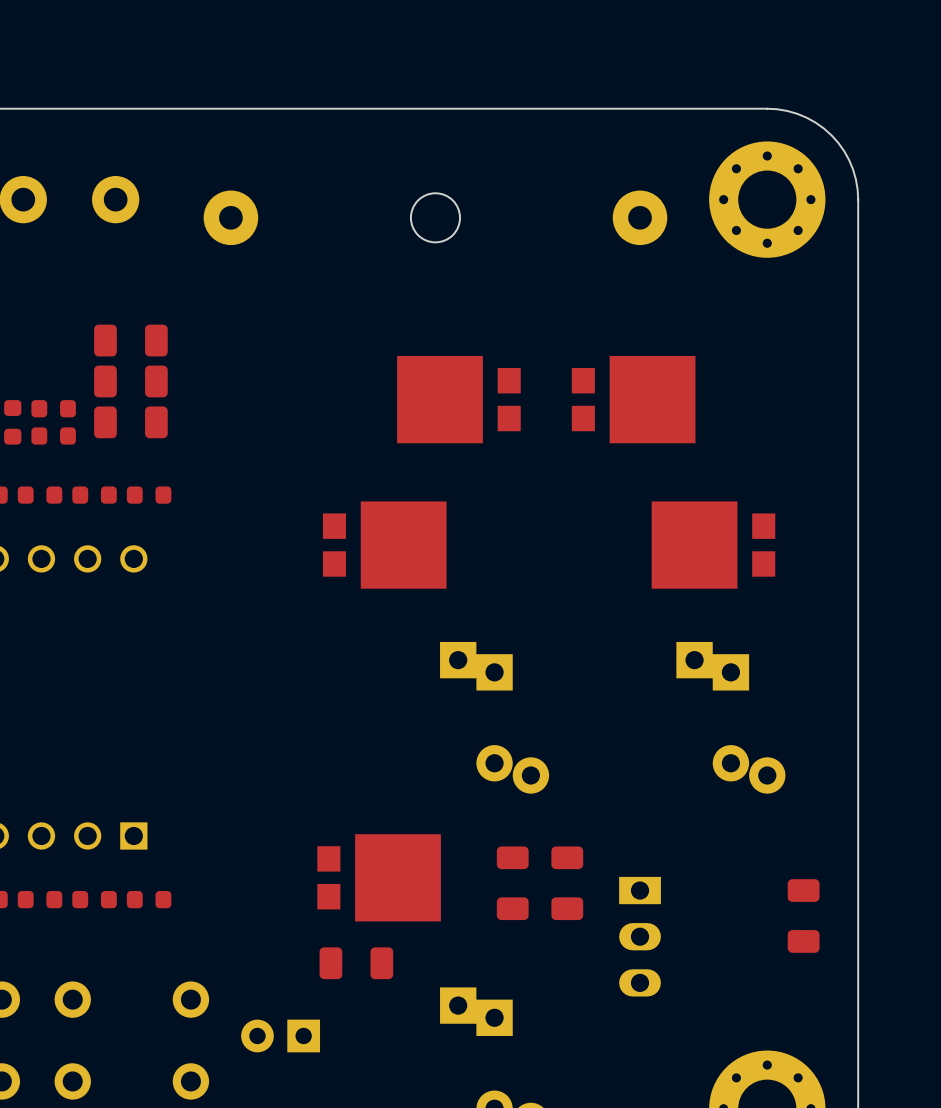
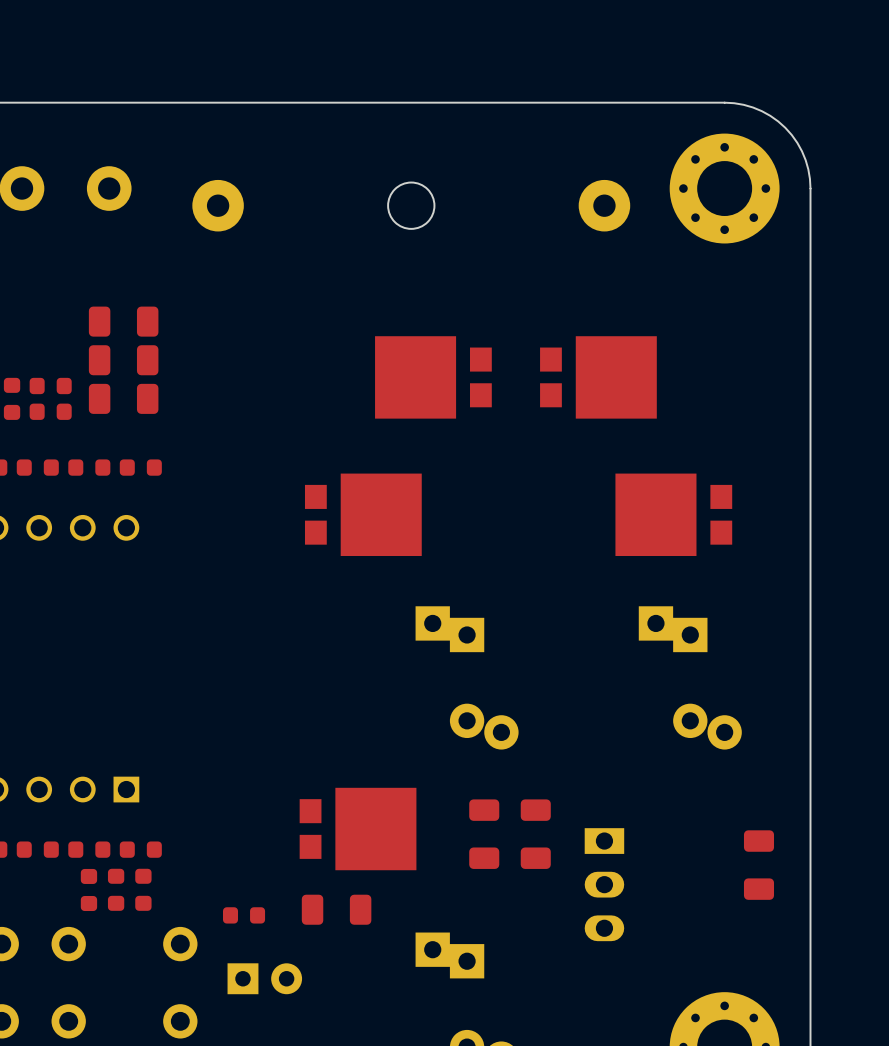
part: none -> (88, 889)
part: none -> (116, 889)
part: none -> (143, 889)
part: none -> (244, 915)
part rotation: 0° (280, 1035) -> 180° (264, 978)

